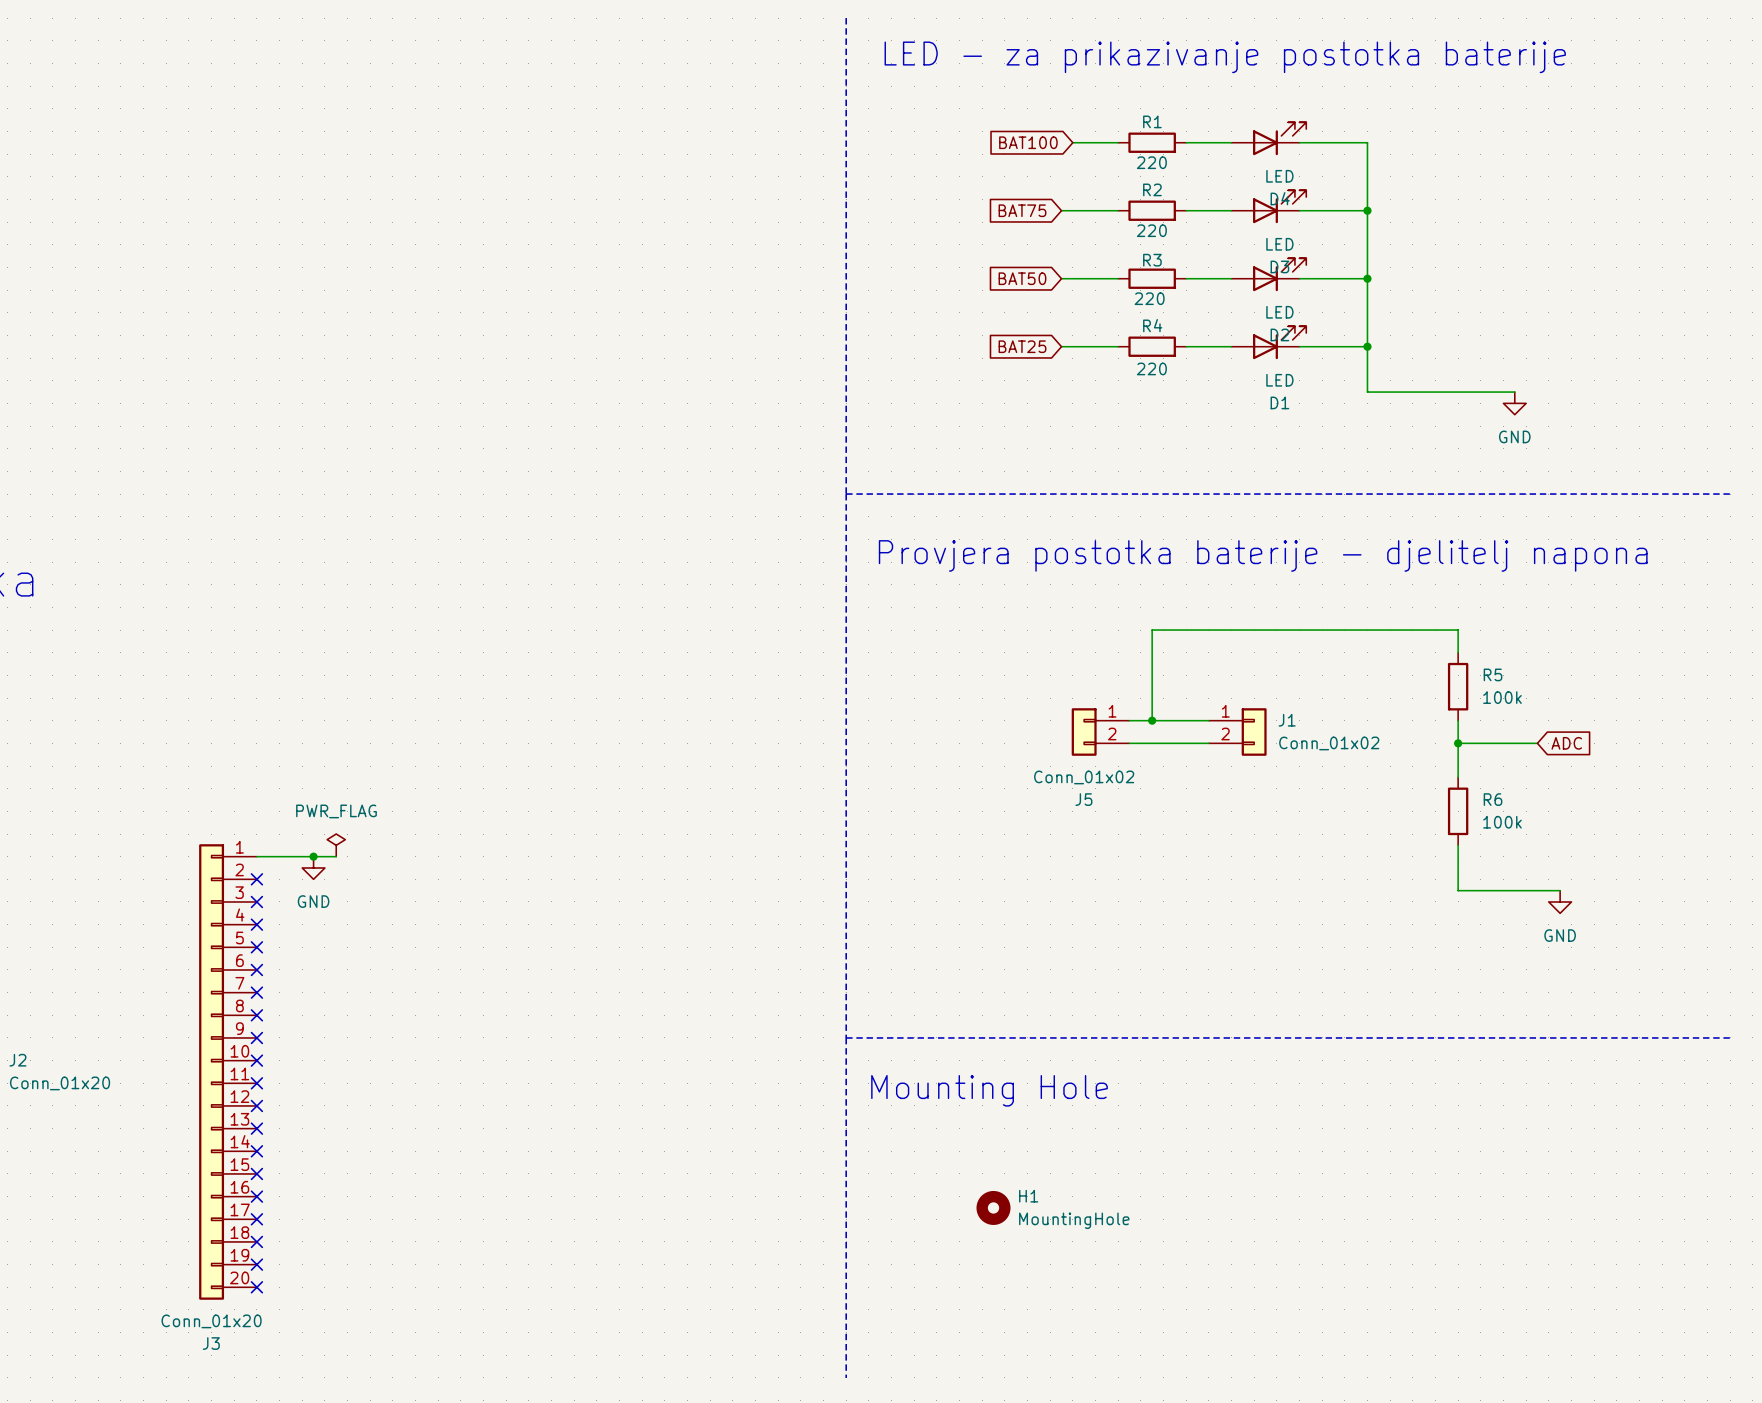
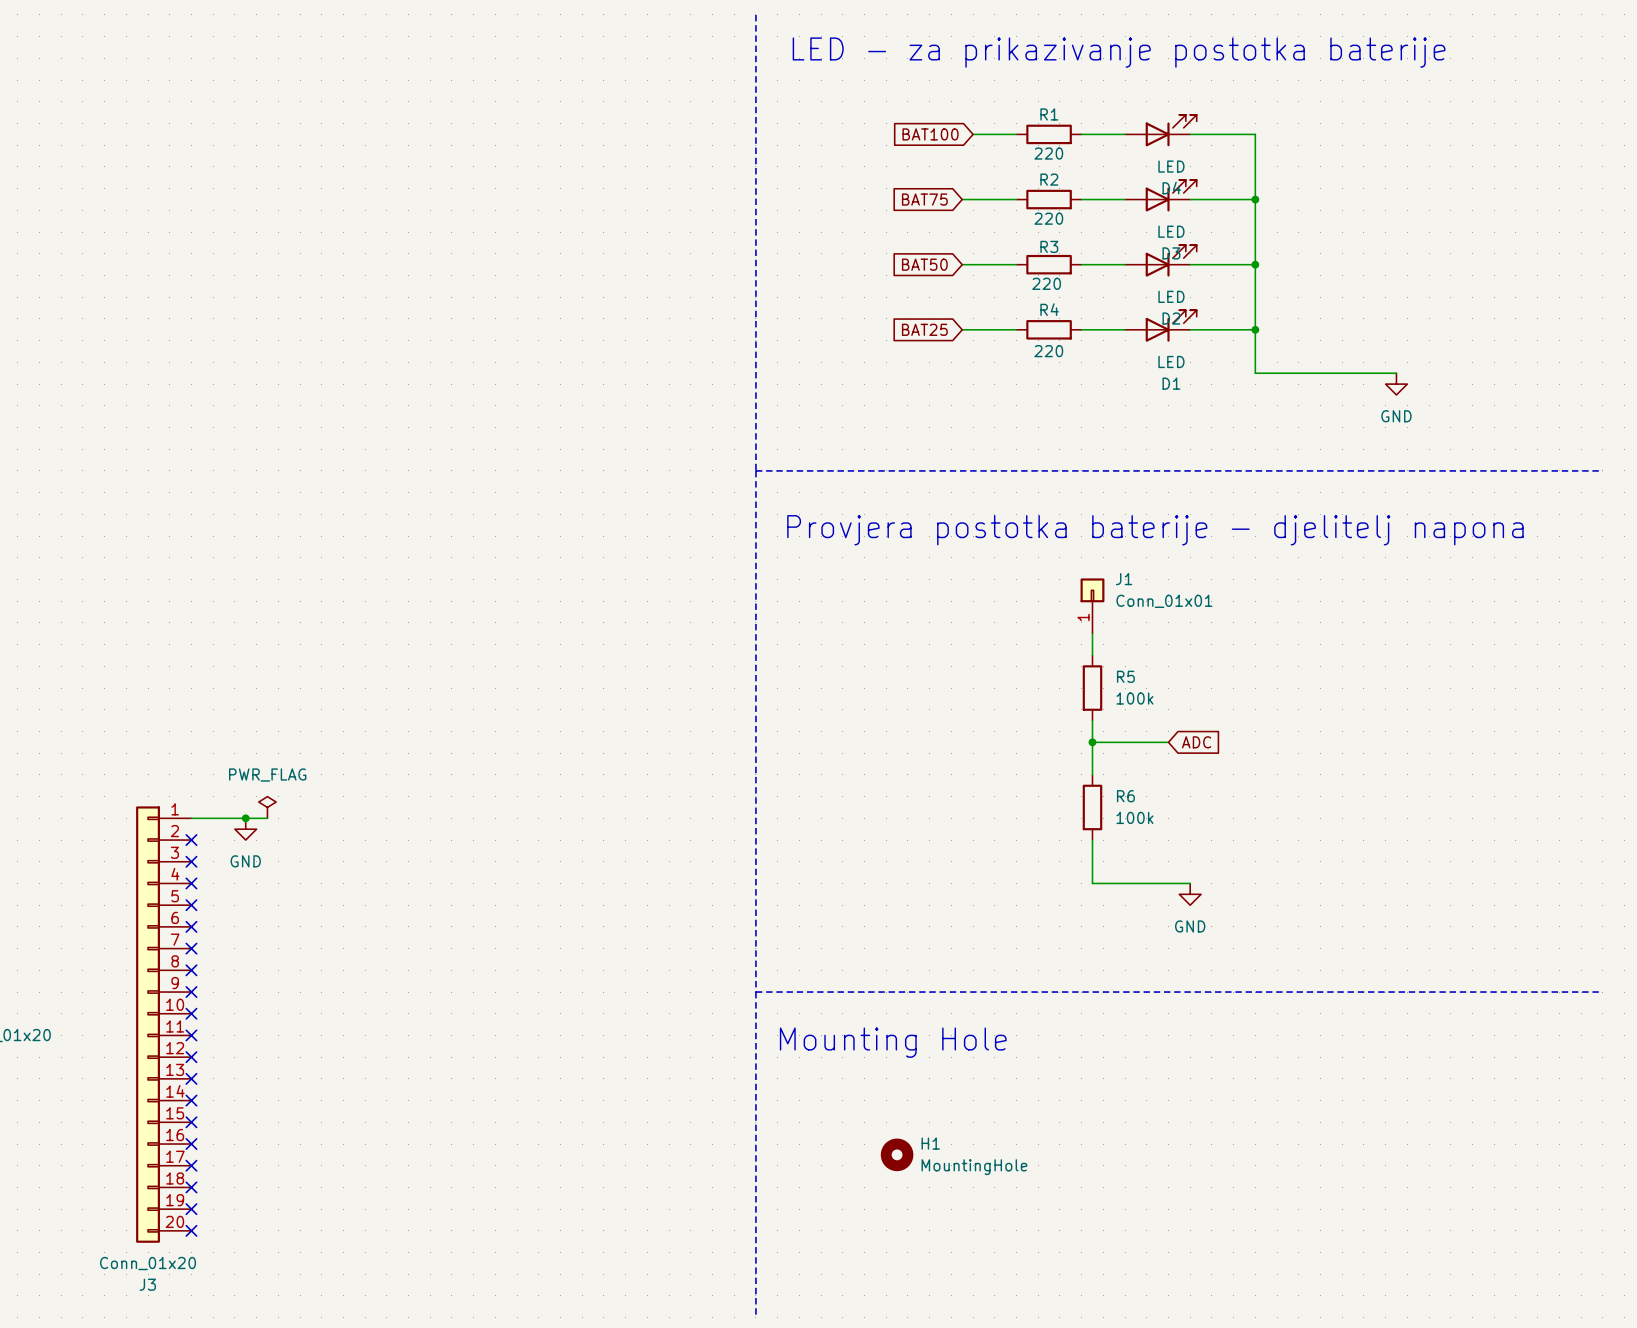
wire: (1458, 652) (1458, 630) (1152, 630) (1152, 720) -> none
wire: none -> (1092, 633) (1092, 655)
R5 position: (1458, 686) -> (1092, 688)
J1 symbol: [1208, 708, 1267, 756] -> [1080, 578, 1105, 634]
wire: (1129, 720) (1208, 720) -> none
junction: (1152, 720) -> none
J1 name position: J1 (1287, 720) -> J1 (1124, 579)
wire: (1458, 720) (1458, 777) -> none
J5: Conn_01x02 (1100, 732) -> none
wire: (1129, 743) (1208, 743) -> (1092, 742) (1168, 742)
J1 value: Conn_01x02 (1329, 743) -> Conn_01x01 (1164, 601)
wire: (1458, 743) (1537, 743) -> none
junction: (1458, 743) -> none
global label: ADC (1566, 743) -> none
wire: none -> (1092, 720) (1092, 774)
junction: none -> (1092, 742)
global label: none -> ADC (1196, 742)
R6 position: (1458, 811) -> (1092, 807)
wire: (1458, 845) (1458, 890) (1560, 890) -> none
wire: none -> (1092, 840) (1092, 883) (1190, 883)
power symbol: GND (1560, 901) -> none
power symbol: none -> GND (1190, 894)

